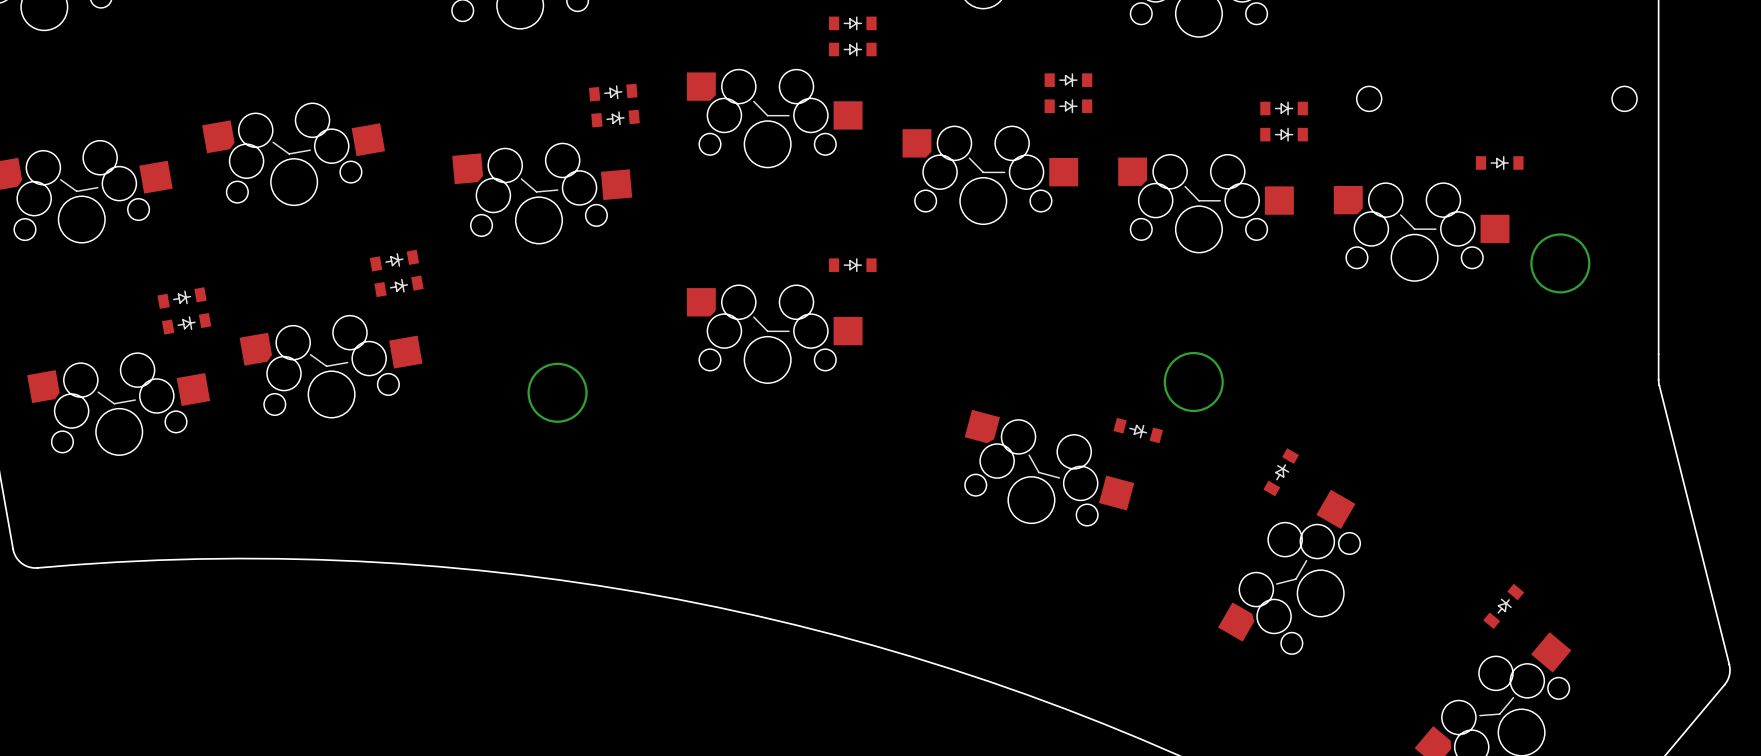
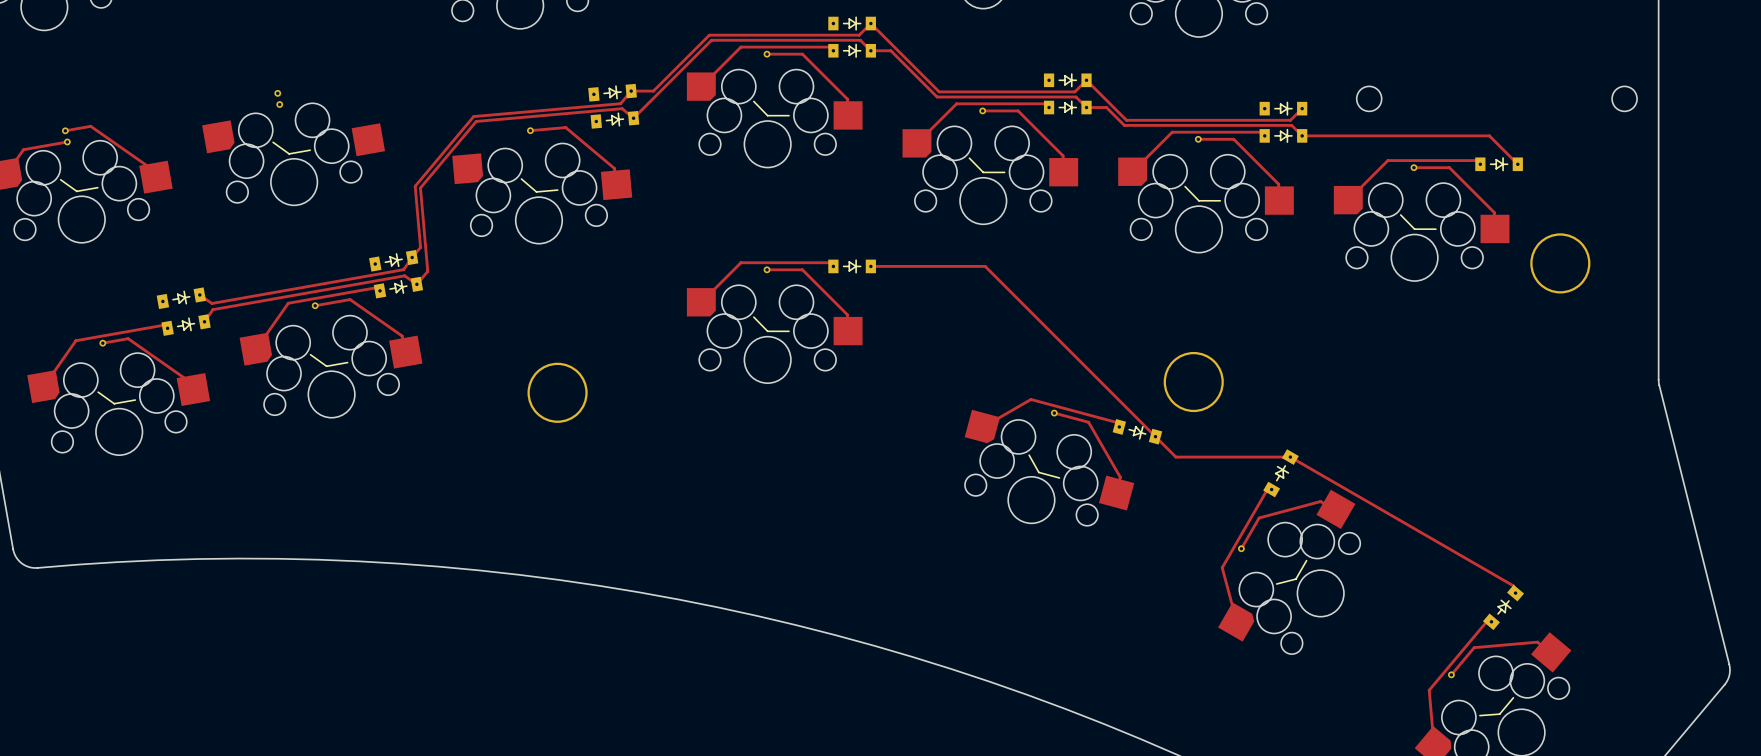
part footprint: [828, 16, 877, 31] -> [828, 16, 876, 31]
part footprint: [828, 42, 877, 57] -> [828, 43, 876, 58]
track: none -> (833, 50) (829, 47) (740, 47) (700, 87)
track: none -> (767, 54) (802, 54) (847, 99) (847, 116)
part: none -> (767, 54)
part footprint: [1044, 73, 1093, 87] -> [1043, 73, 1092, 88]
part footprint: [588, 83, 638, 102] -> [588, 83, 637, 102]
part: none -> (277, 93)
part footprint: [1044, 99, 1093, 114] -> [1043, 100, 1092, 115]
part footprint: [1260, 101, 1308, 116] -> [1259, 101, 1308, 116]
part: none -> (279, 104)
track: none -> (1049, 107) (1045, 103) (956, 103) (916, 144)
track: none -> (1302, 108) (1290, 120) (1126, 120) (1086, 80) (1074, 91) (939, 91) (870, 23) (859, 35) (709, 35) (653, 91) (631, 91) (620, 103) (473, 116) (415, 186) (420, 247) (403, 269) (211, 303) (199, 294)
part footprint: [591, 109, 640, 128] -> [590, 111, 640, 129]
track: none -> (982, 110) (1018, 110) (1063, 155) (1063, 172)
part: none -> (982, 110)
part footprint: [1260, 127, 1308, 142] -> [1259, 129, 1308, 143]
track: none -> (65, 130) (90, 126) (154, 170) (155, 177)
part: none -> (65, 130)
track: none -> (530, 130) (565, 127) (614, 168) (615, 185)
part: none -> (530, 130)
track: none -> (1264, 135) (1261, 132) (1172, 132) (1132, 172)
track: none -> (1302, 135) (1489, 135) (1517, 164)
track: none -> (1302, 135) (1291, 125) (1124, 125) (1106, 107) (1086, 107) (1076, 97) (937, 97) (890, 50) (870, 50) (860, 40) (711, 40) (633, 118) (622, 108) (476, 121) (420, 187) (427, 271) (416, 284) (404, 275) (213, 309) (204, 321)
track: none -> (1198, 139) (1233, 139) (1278, 184) (1278, 201)
part: none -> (1198, 139)
track: none -> (67, 141) (23, 149) (5, 174)
part: none -> (67, 141)
part footprint: [1475, 156, 1524, 170] -> [1475, 157, 1523, 172]
track: none -> (1480, 164) (1476, 160) (1387, 160) (1347, 200)
track: none -> (1413, 167) (1449, 167) (1494, 212) (1494, 229)
part: none -> (1413, 167)
part footprint: [369, 249, 420, 272] -> [369, 249, 419, 272]
part footprint: [828, 258, 877, 272] -> [828, 259, 876, 274]
track: none -> (833, 266) (829, 262) (740, 262) (700, 302)
track: none -> (870, 266) (985, 266) (1175, 457) (1290, 457) (1513, 585) (1515, 593)
track: none -> (767, 269) (802, 269) (847, 314) (847, 331)
part: none -> (767, 269)
part footprint: [374, 275, 424, 298] -> [373, 276, 424, 299]
part footprint: [157, 287, 207, 309] -> [156, 287, 206, 310]
track: none -> (379, 290) (375, 287) (288, 303) (255, 349)
track: none -> (315, 305) (350, 299) (402, 336) (405, 352)
part: none -> (315, 305)
part footprint: [161, 312, 212, 335] -> [161, 314, 211, 336]
track: none -> (167, 328) (163, 325) (75, 340) (43, 387)
track: none -> (102, 343) (128, 338) (191, 383) (192, 390)
part: none -> (102, 343)
track: none -> (1054, 413) (1088, 422) (1120, 477) (1115, 493)
part: none -> (1054, 413)
part footprint: [1113, 417, 1163, 444] -> [1112, 419, 1163, 445]
track: none -> (1119, 426) (1116, 422) (1030, 399) (981, 427)
part footprint: [1263, 448, 1299, 497] -> [1263, 449, 1299, 498]
track: none -> (1271, 489) (1266, 490) (1222, 567) (1236, 622)
track: none -> (1335, 510) (1320, 501) (1259, 518) (1241, 548)
part: none -> (1241, 548)
part footprint: [1483, 583, 1525, 630] -> [1482, 584, 1525, 631]
track: none -> (1491, 621) (1486, 622) (1429, 690) (1434, 746)
track: none -> (1550, 653) (1537, 642) (1474, 647) (1451, 674)
part: none -> (1451, 674)

